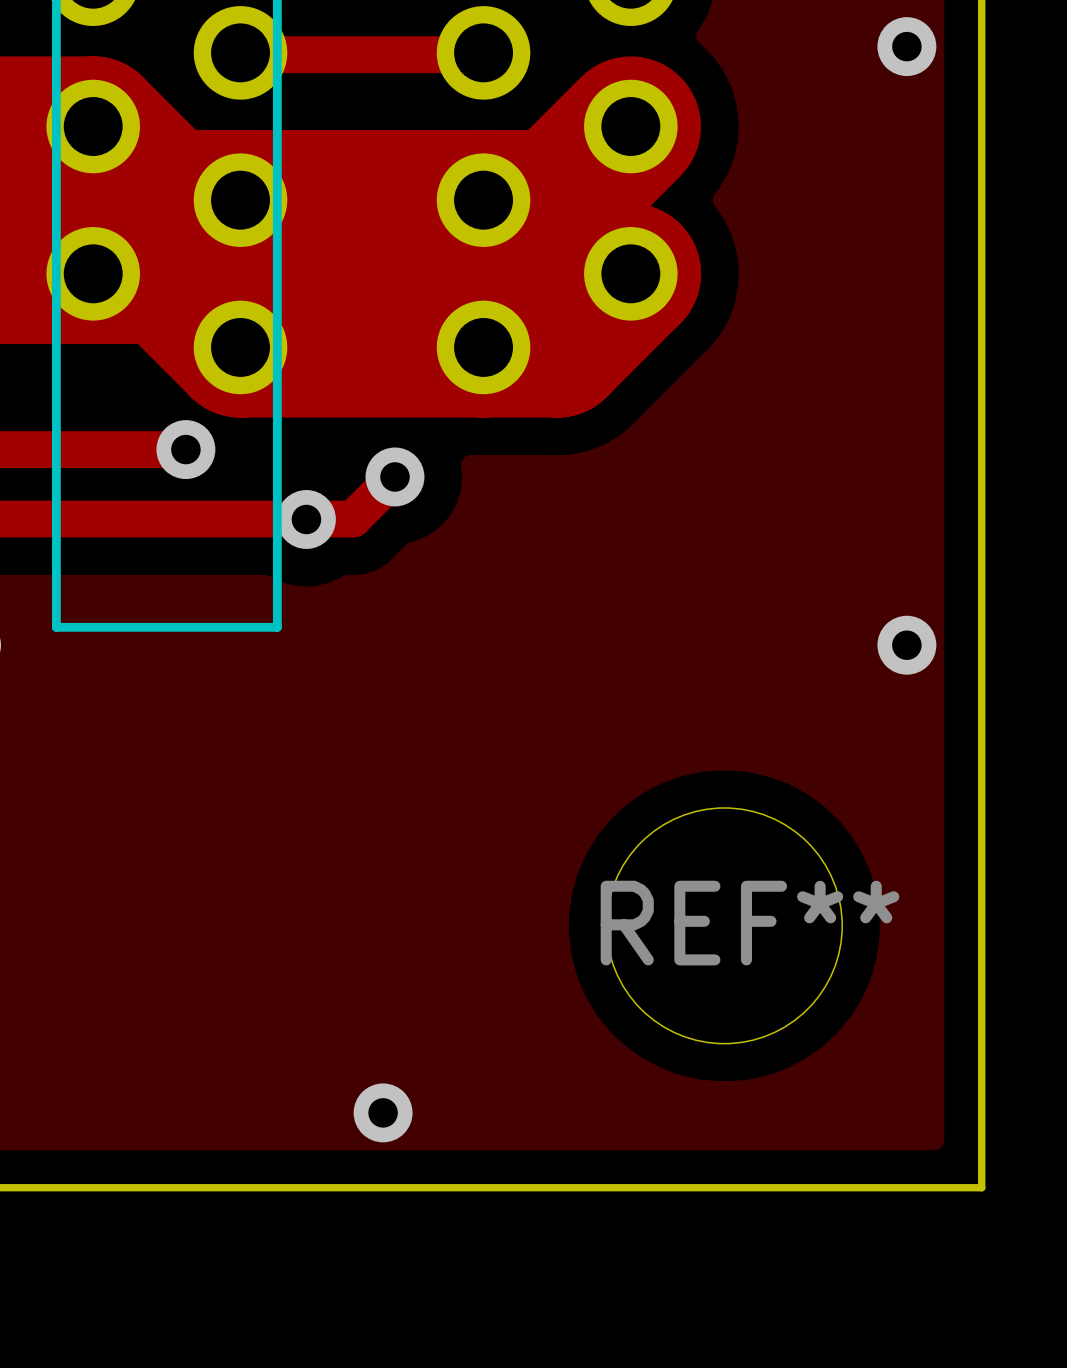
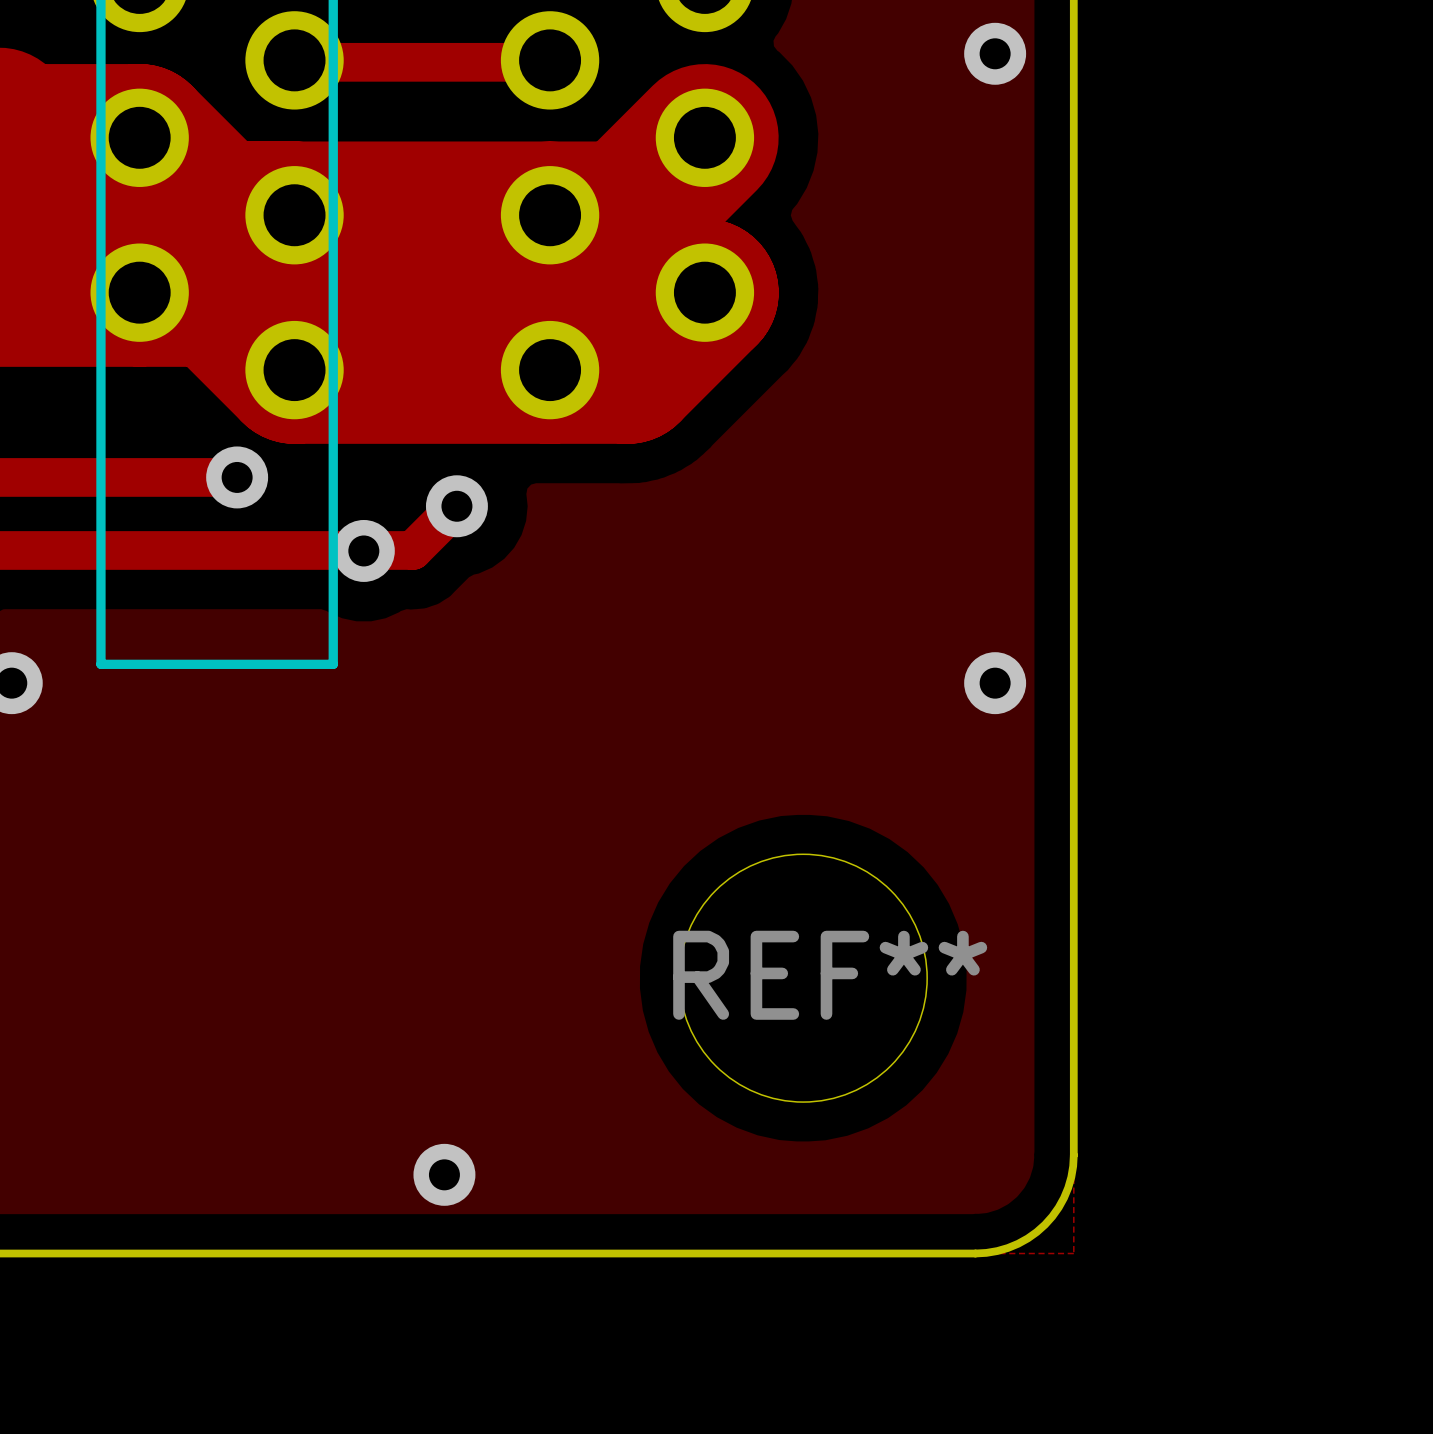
board edge: (981, 1094) (981, 1187) (888, 1187) -> (1073, 1155) (1071, 1177) (1064, 1197) (1045, 1224) (1027, 1238) (1007, 1247) (975, 1253)

